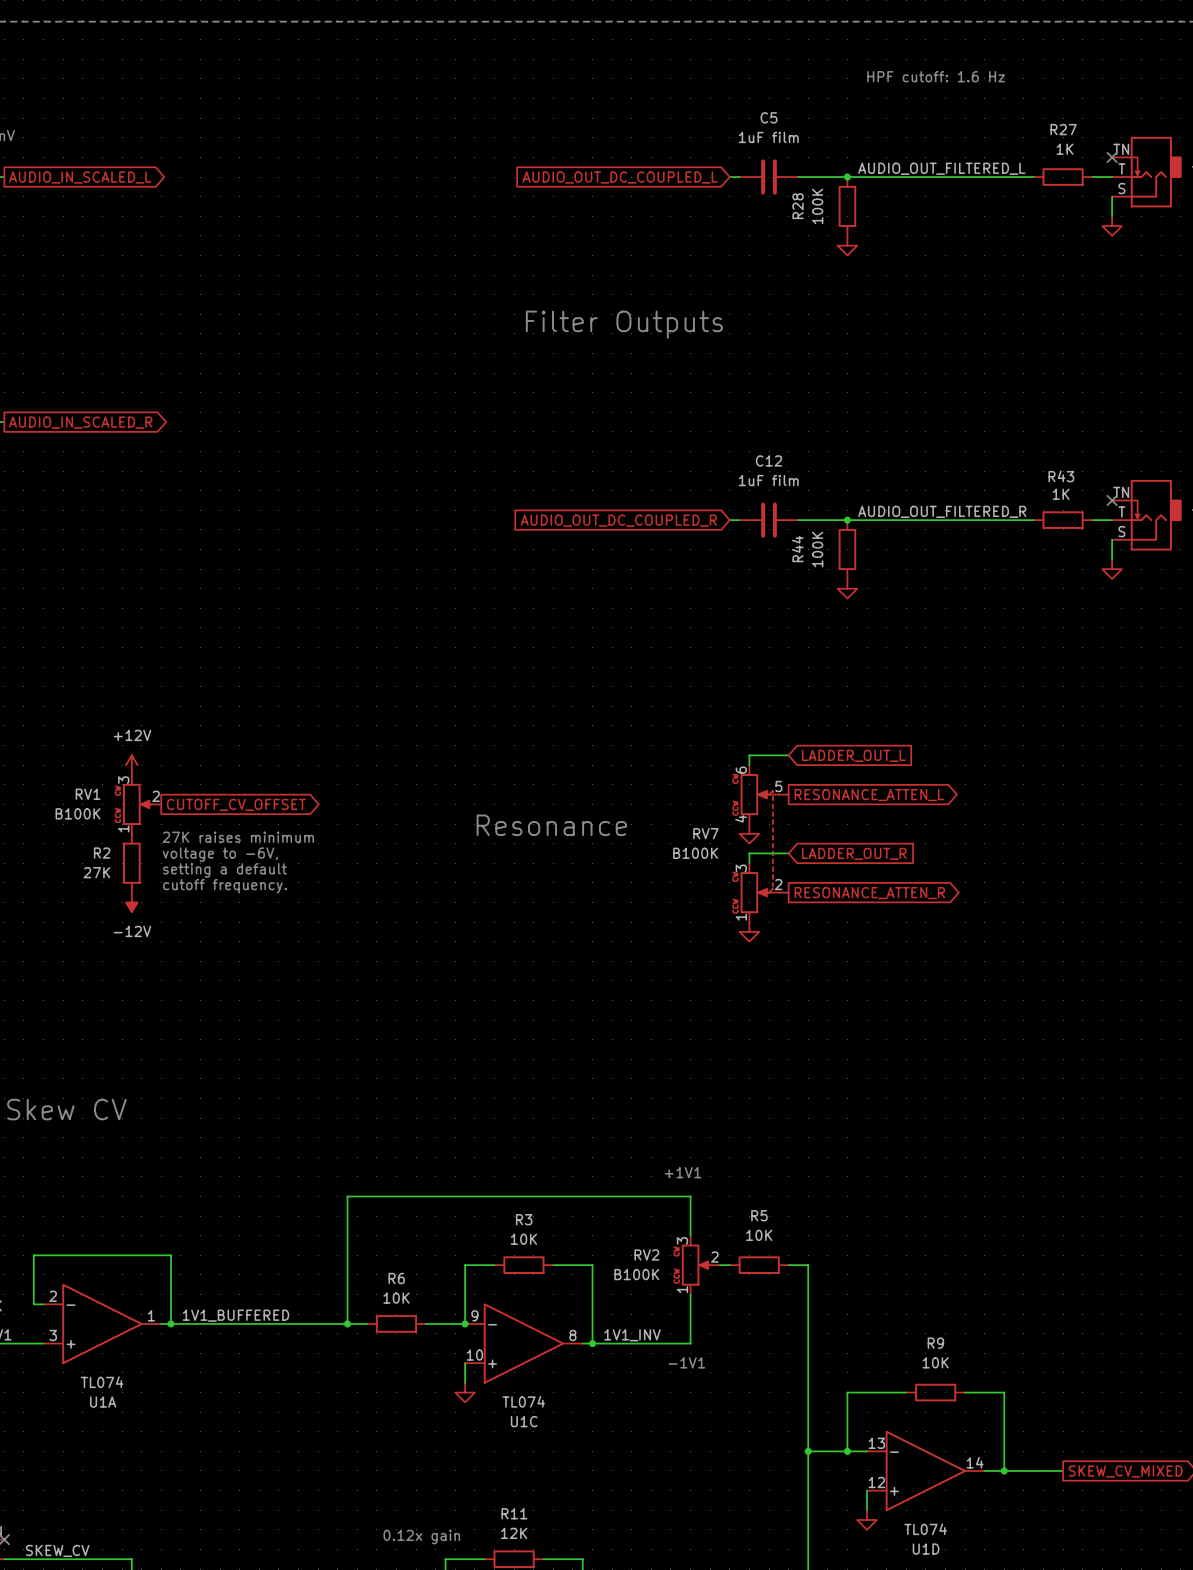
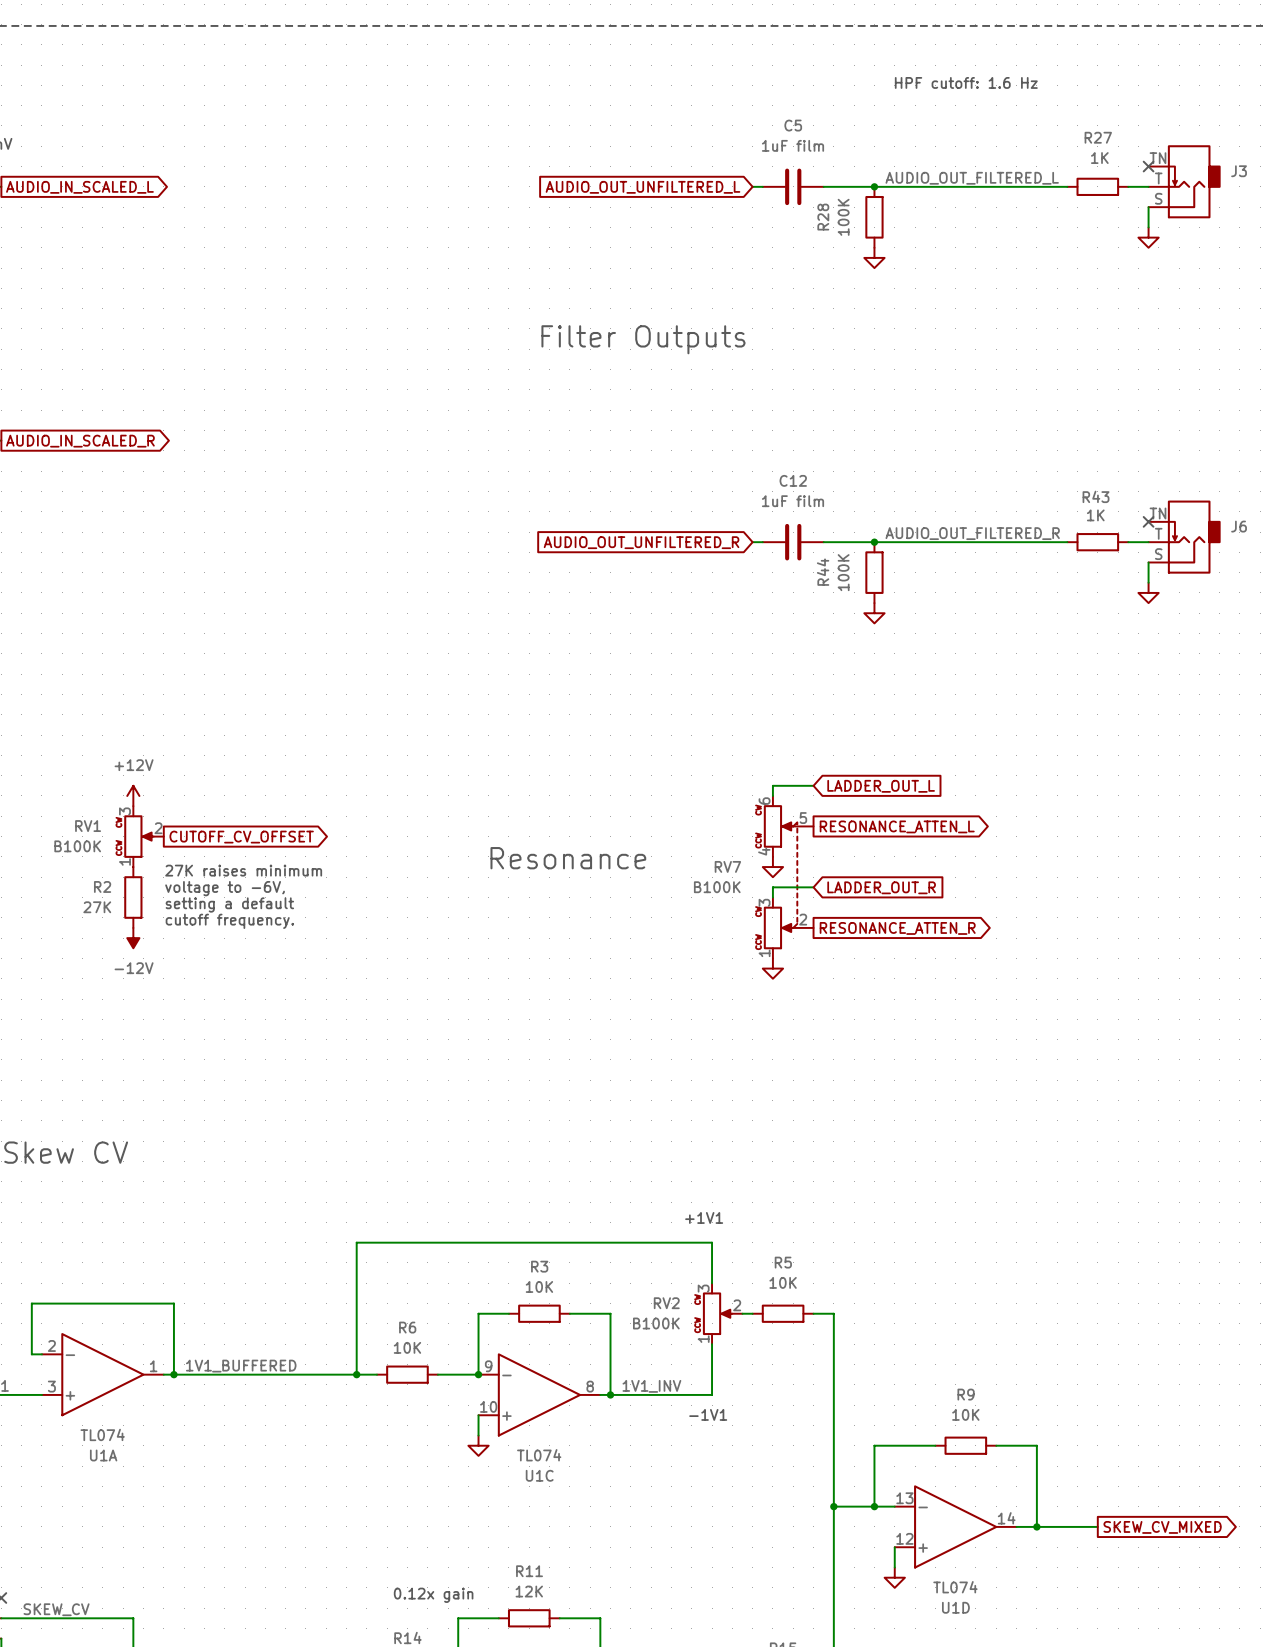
global label: AUDIO_OUT_DC_COUPLED_L (620, 177) -> AUDIO_OUT_UNFILTERED_L (642, 187)
global label: AUDIO_OUT_DC_COUPLED_R (618, 520) -> AUDIO_OUT_UNFILTERED_R (641, 542)

